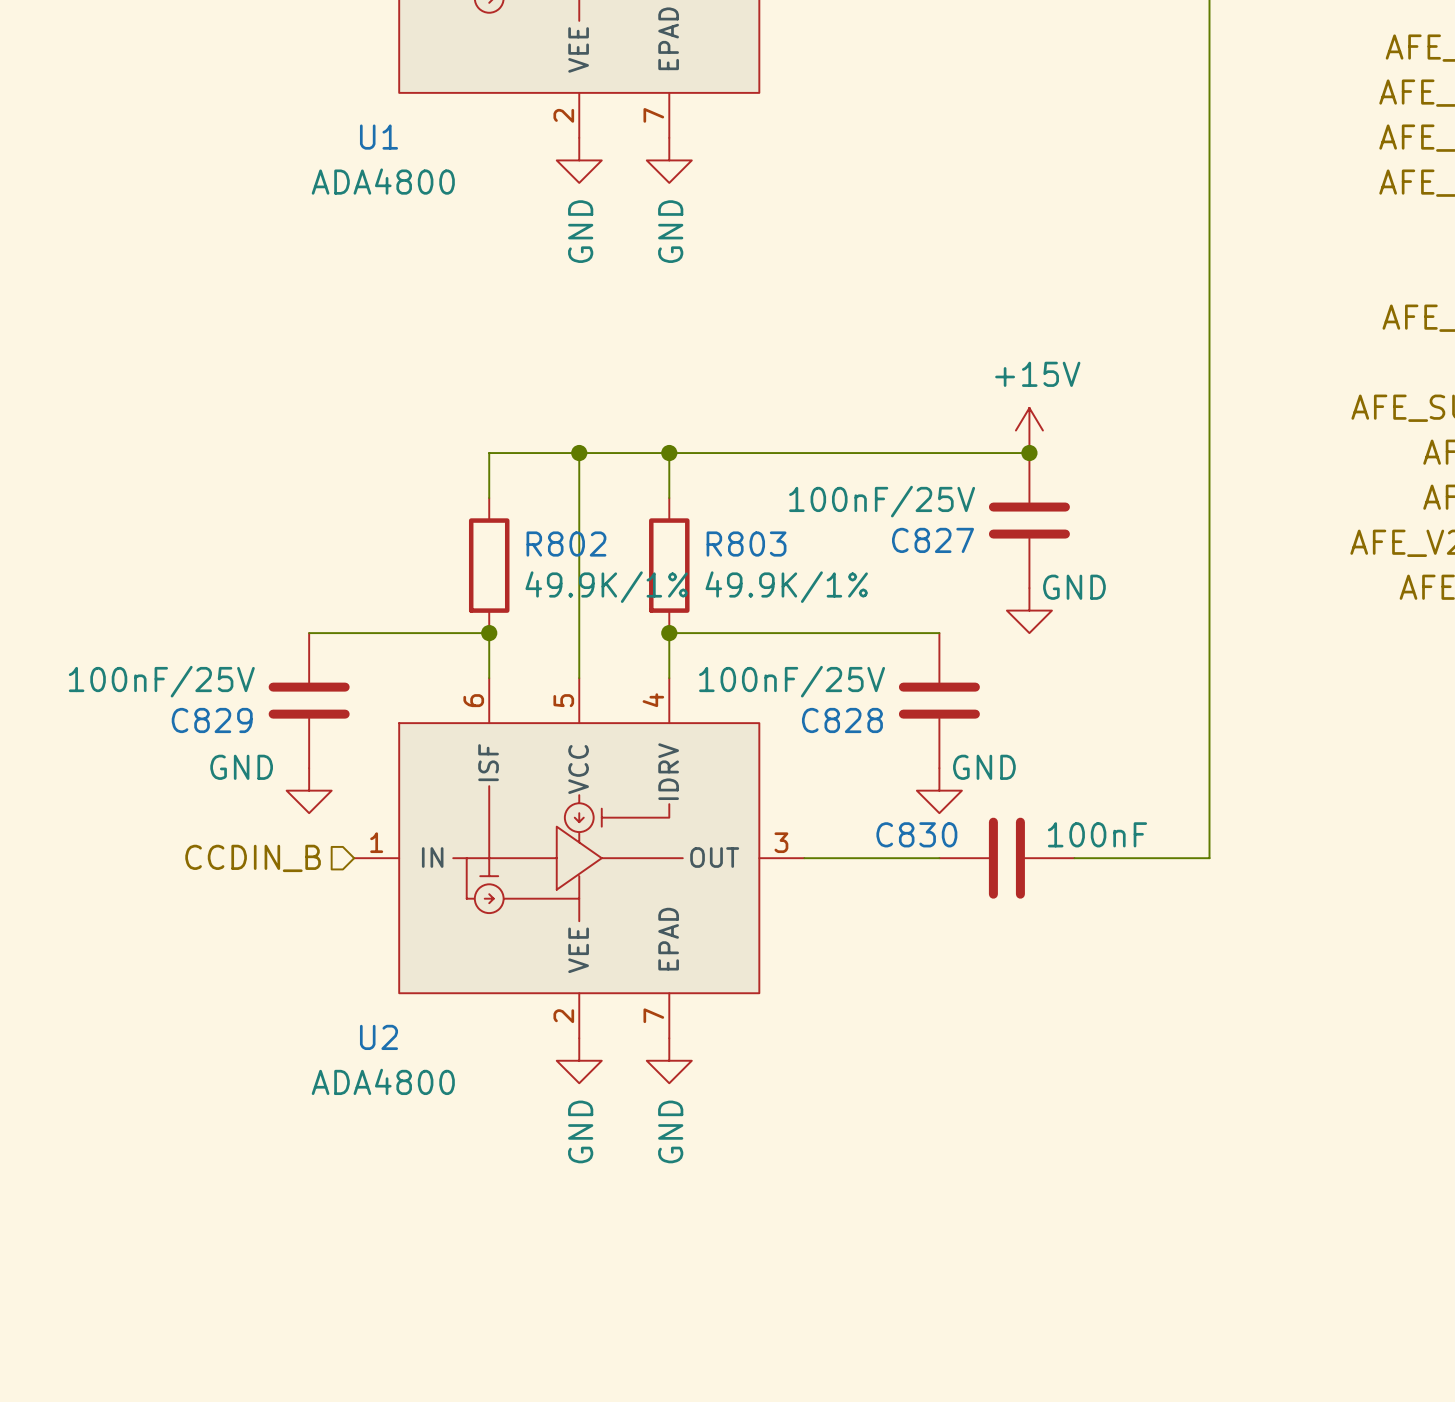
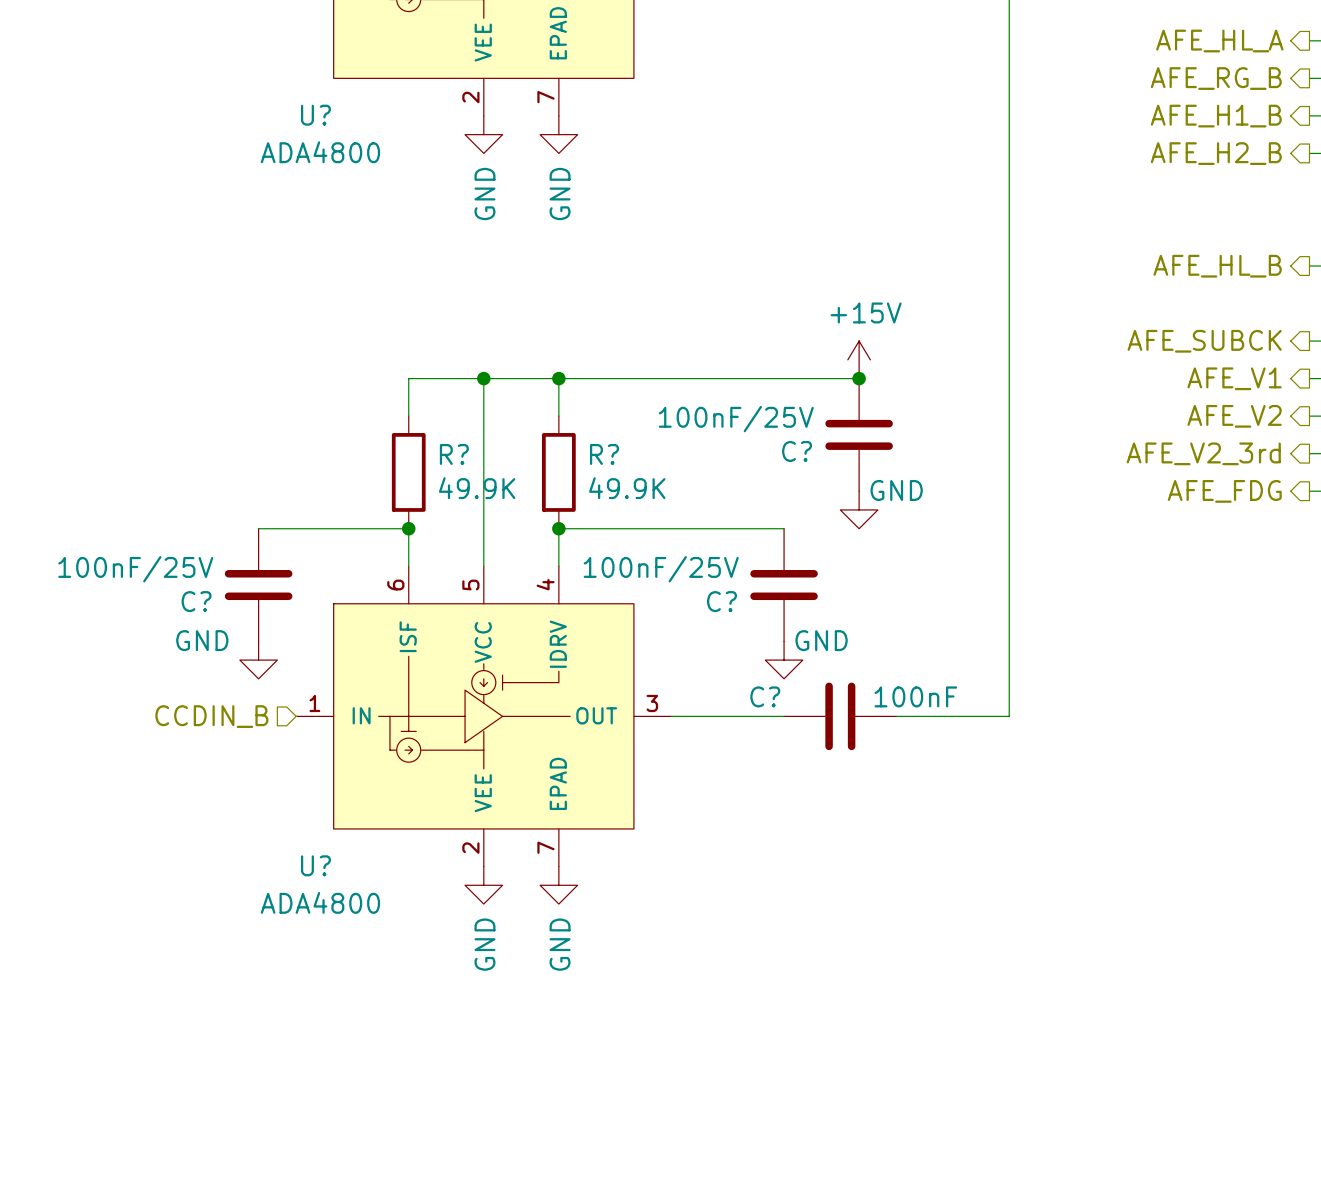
U1 name: U1 (378, 137) -> U? (315, 115)
C827 name: C827 (933, 540) -> C? (797, 451)
R802 name: R802 (566, 544) -> R? (454, 454)
R803 name: R803 (746, 544) -> R? (604, 454)
R802 value: 49.9K/1% (606, 587) -> 49.9K (477, 488)
R803 value: 49.9K/1% (786, 587) -> 49.9K (627, 488)
C829 name: C829 (212, 720) -> C? (196, 601)
C828 name: C828 (842, 720) -> C? (721, 601)
C830 name: C830 (916, 834) -> C? (765, 696)
U2 name: U2 (378, 1037) -> U? (315, 865)

